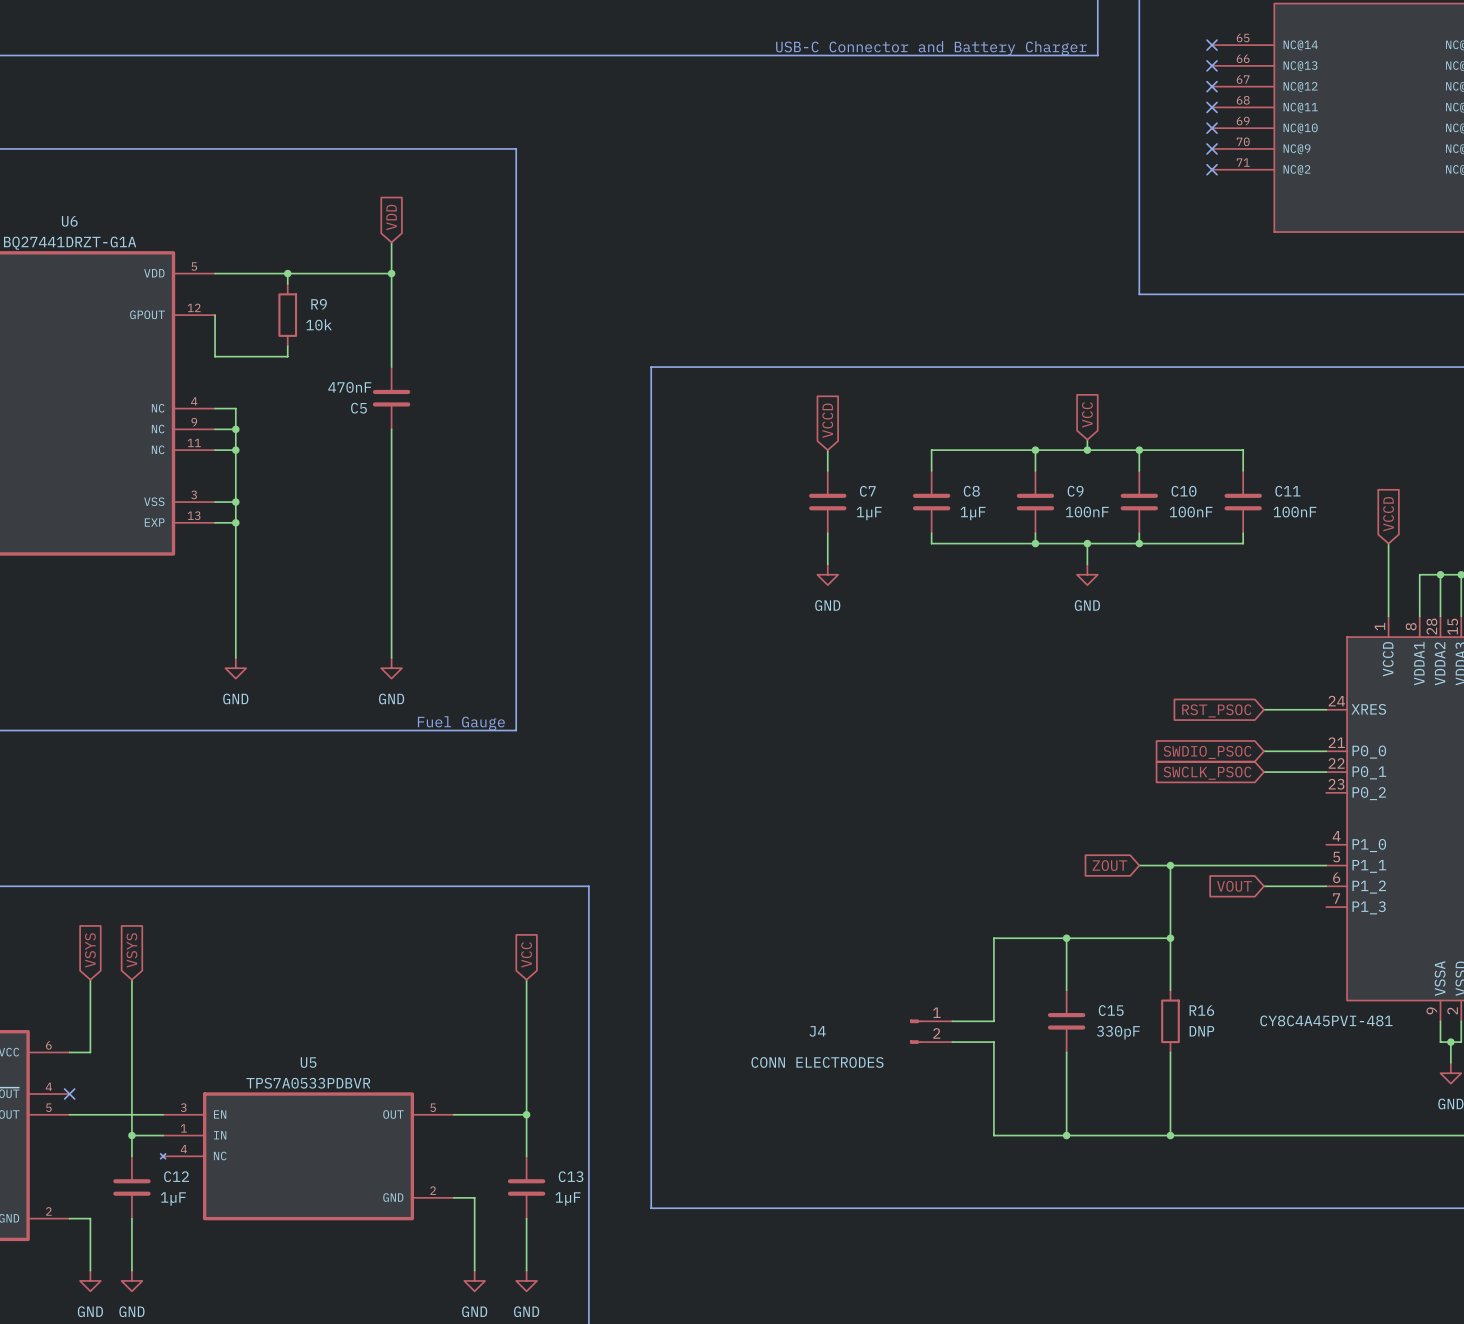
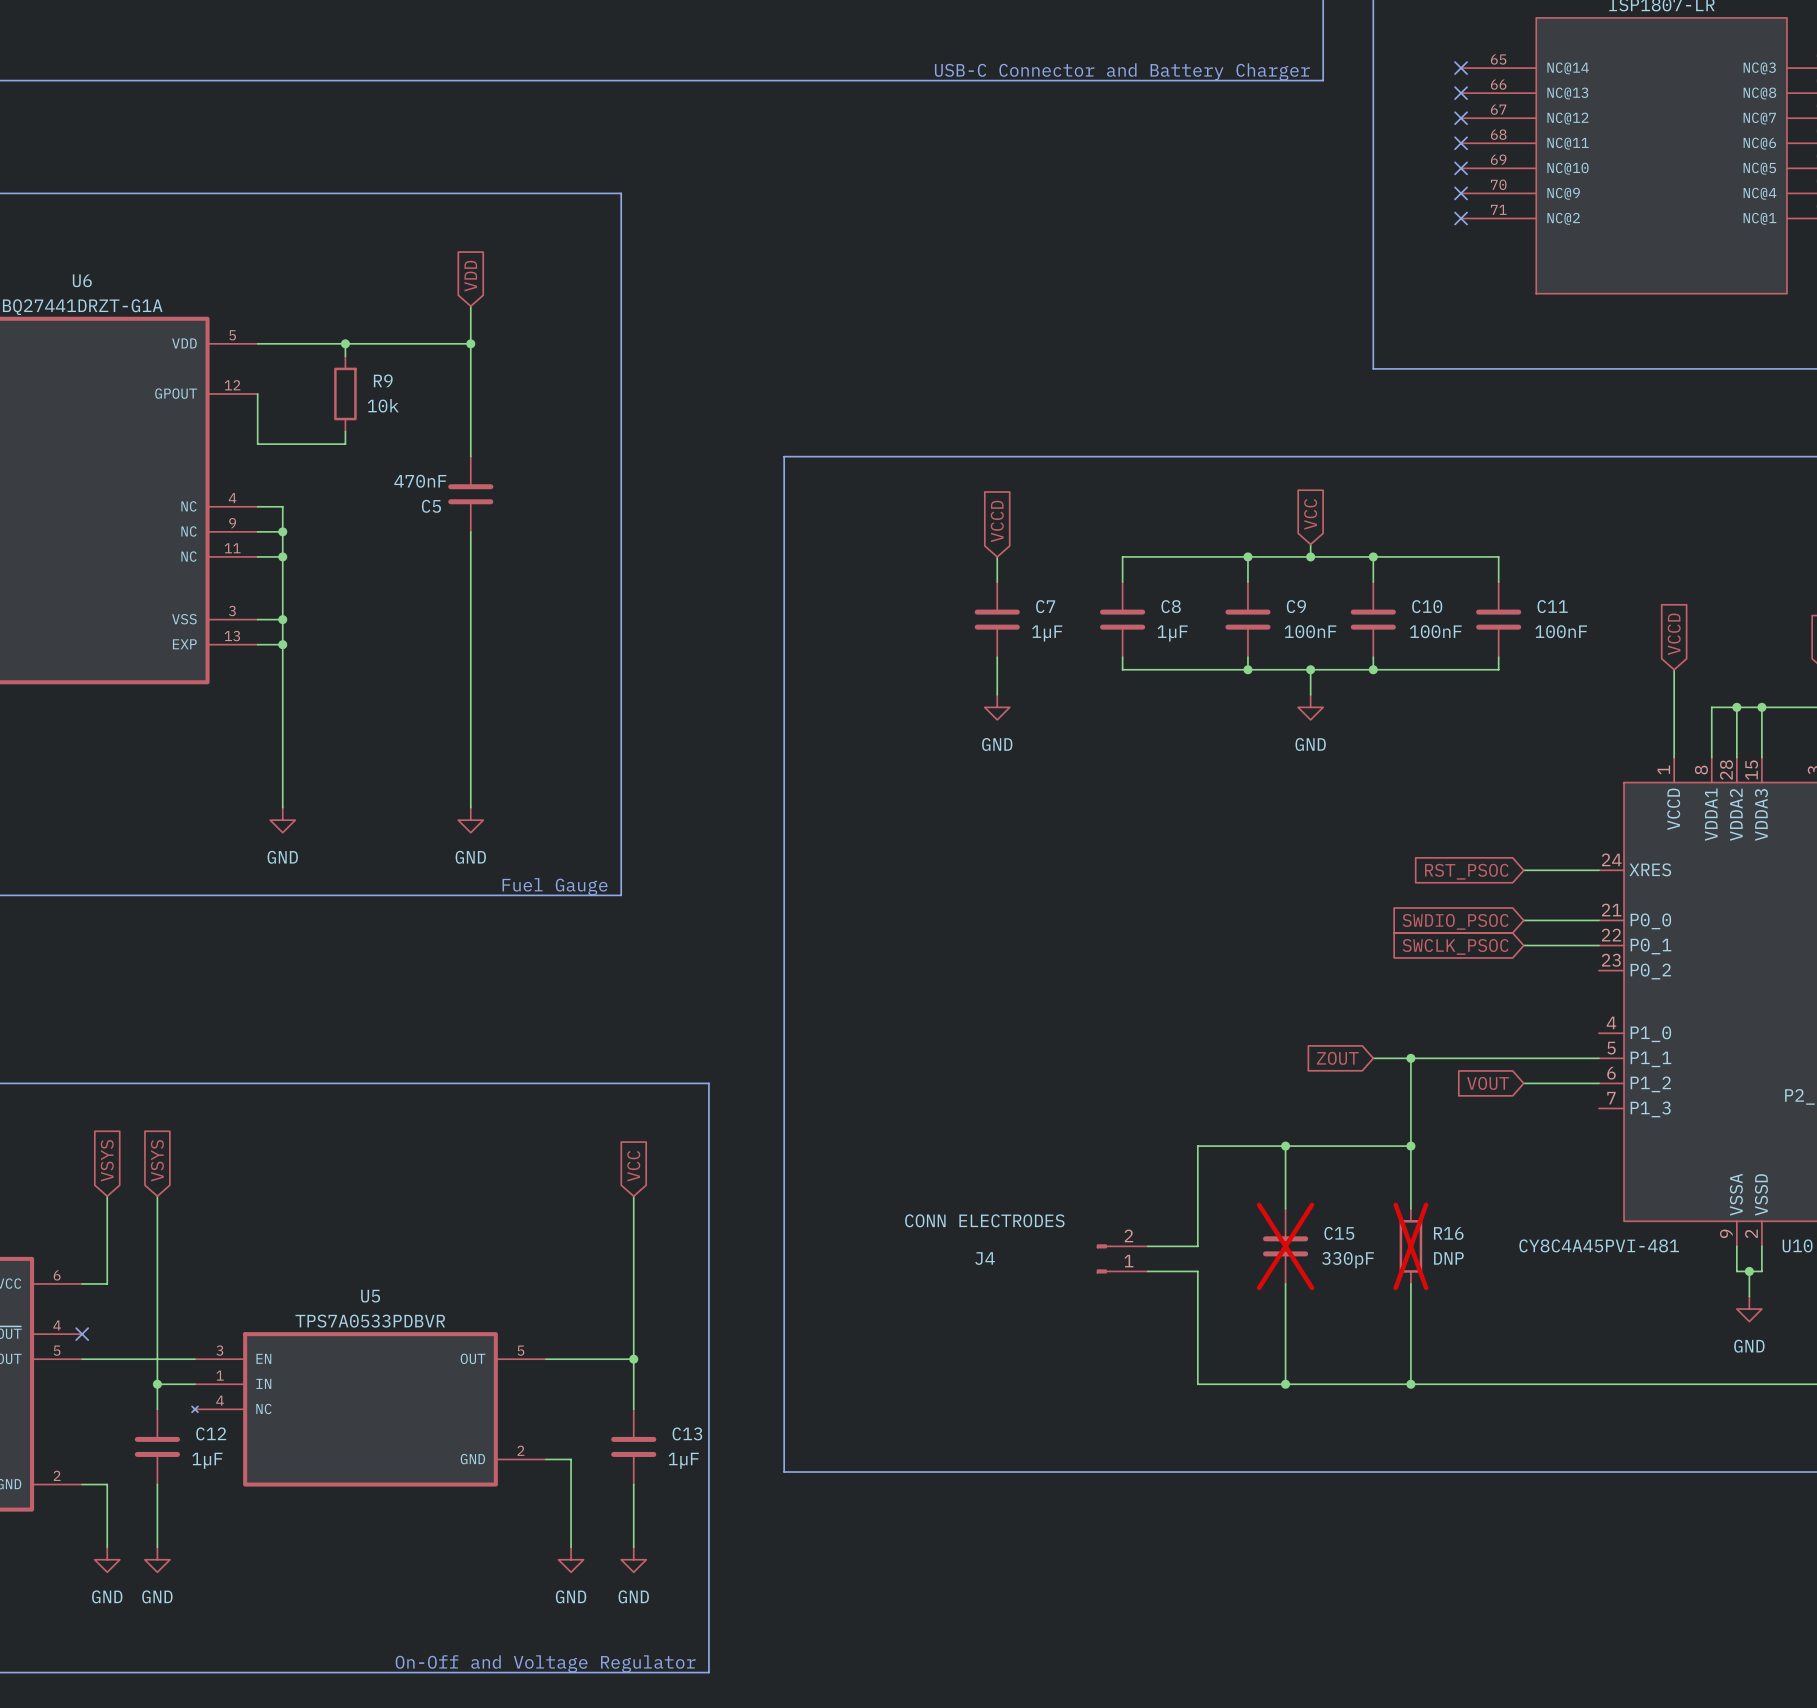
C15 do-not-place cross: none -> (1285, 1246)
R16 do-not-place cross: none -> (1410, 1246)
J4 flip: as is (916, 1031) -> up-down (1103, 1258)

